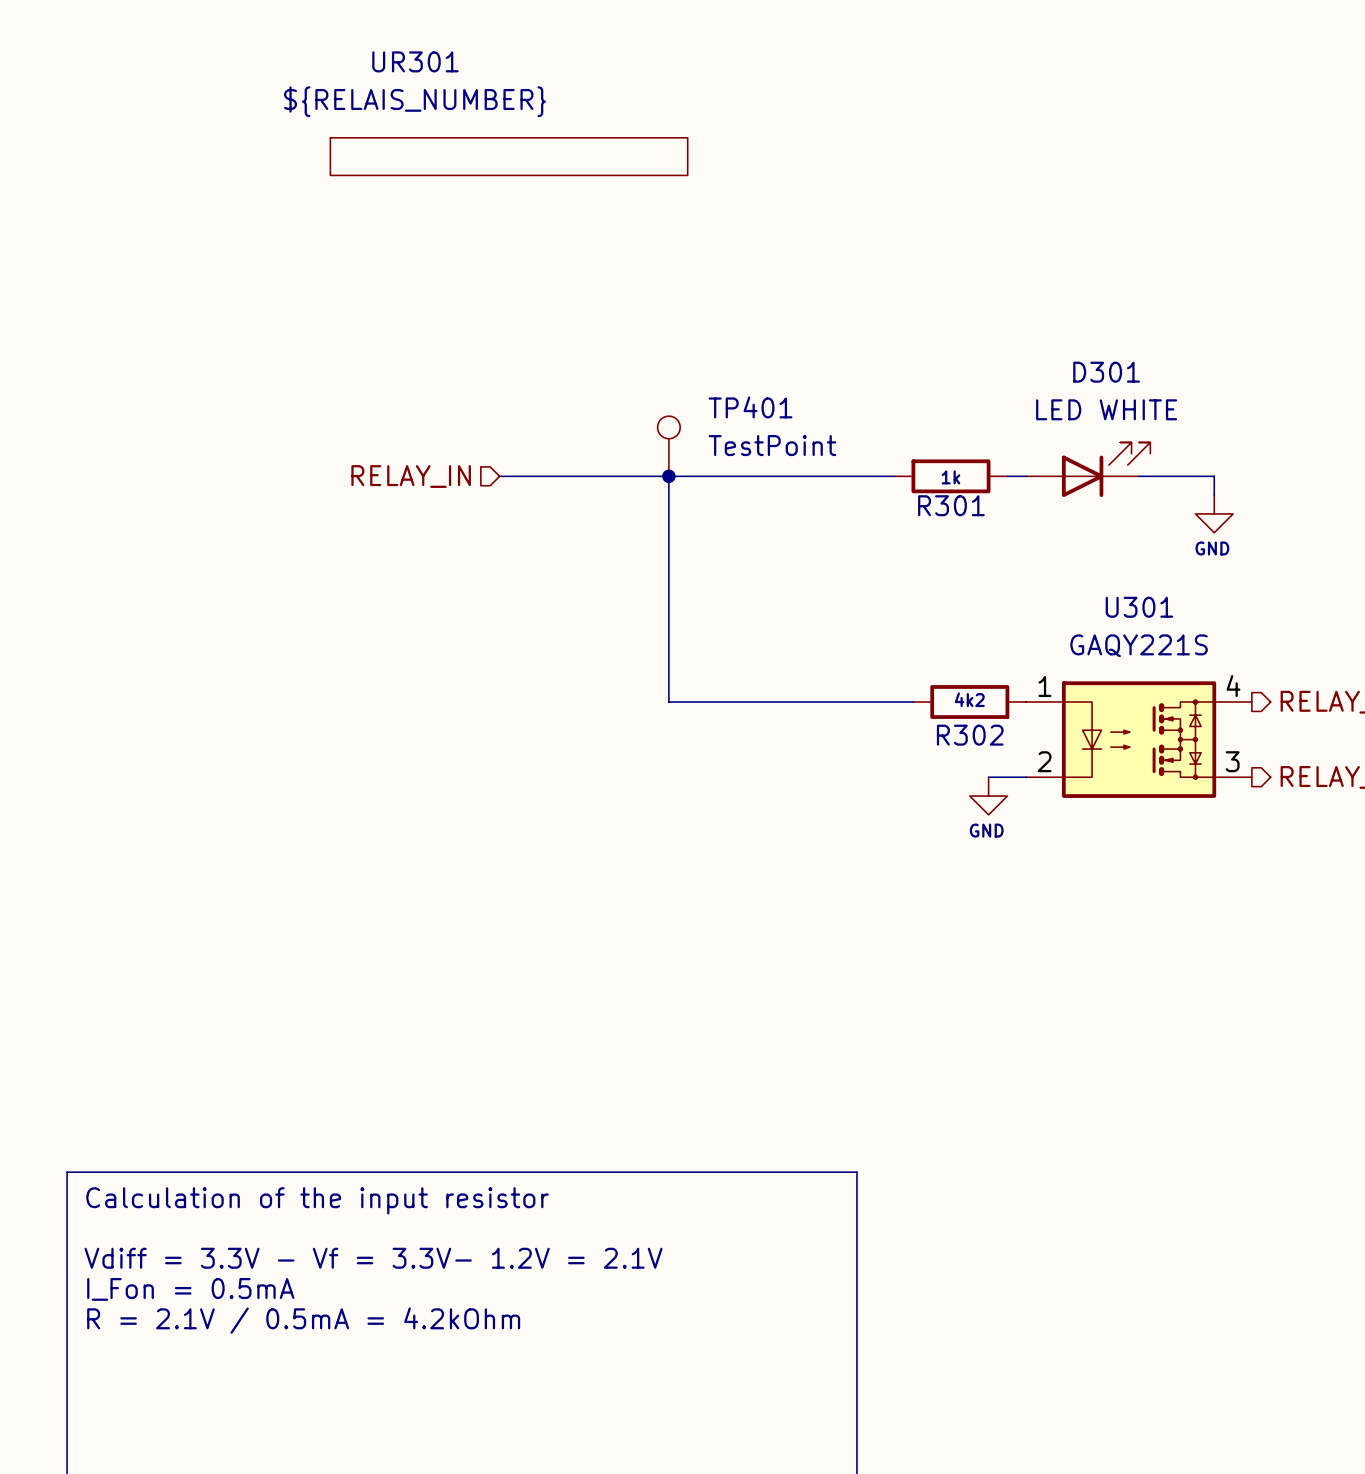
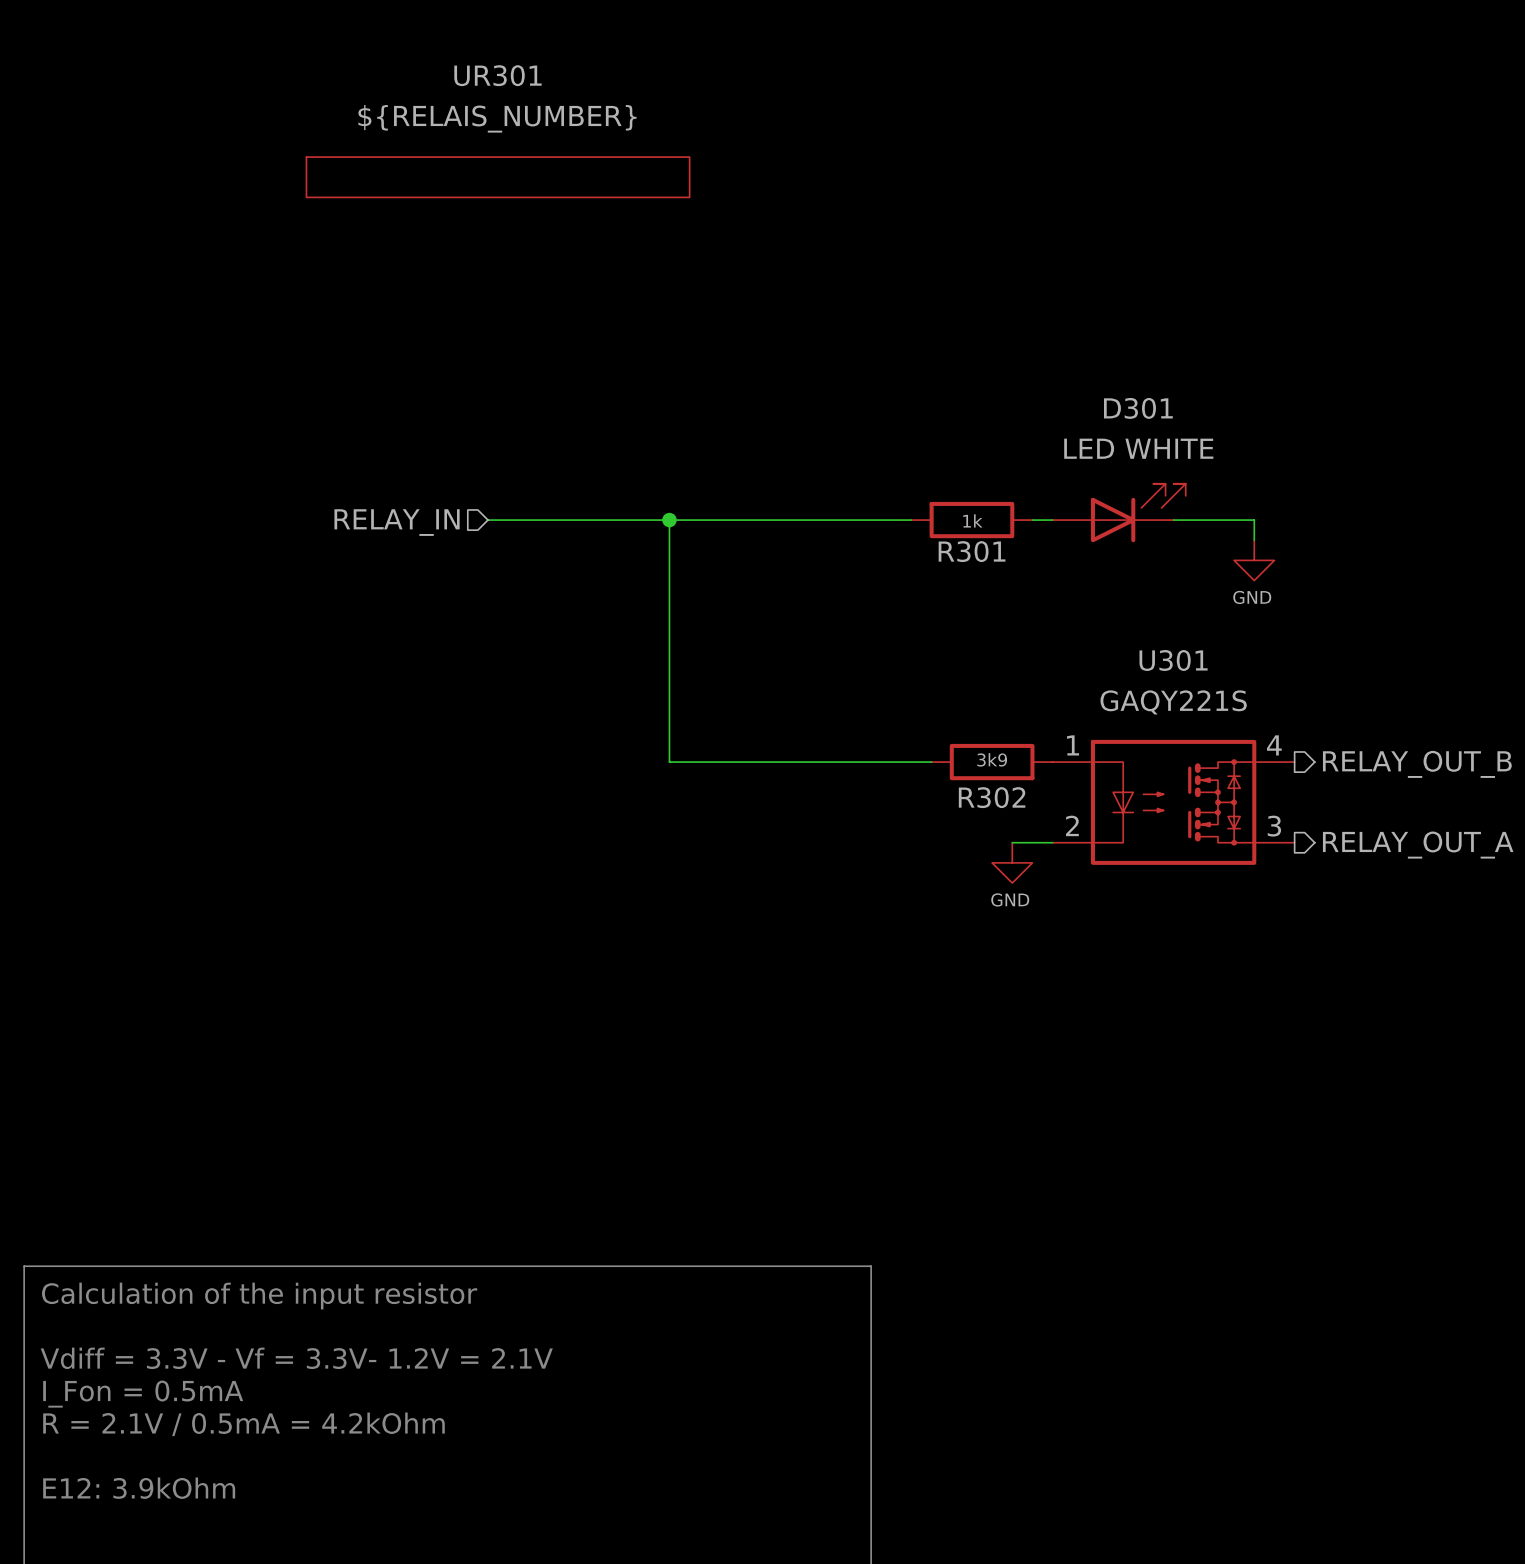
UR301 name position: UR301 (415, 61) -> UR301 (497, 75)
UR301 value position: ${RELAIS_NUMBER} (415, 101) -> ${RELAIS_NUMBER} (497, 118)
TP401: TestPoint (668, 446) -> none
R302 value: 4k2 (969, 699) -> 3k9 (992, 759)
text: none -> E12: 3.9kOhm (139, 1488)

